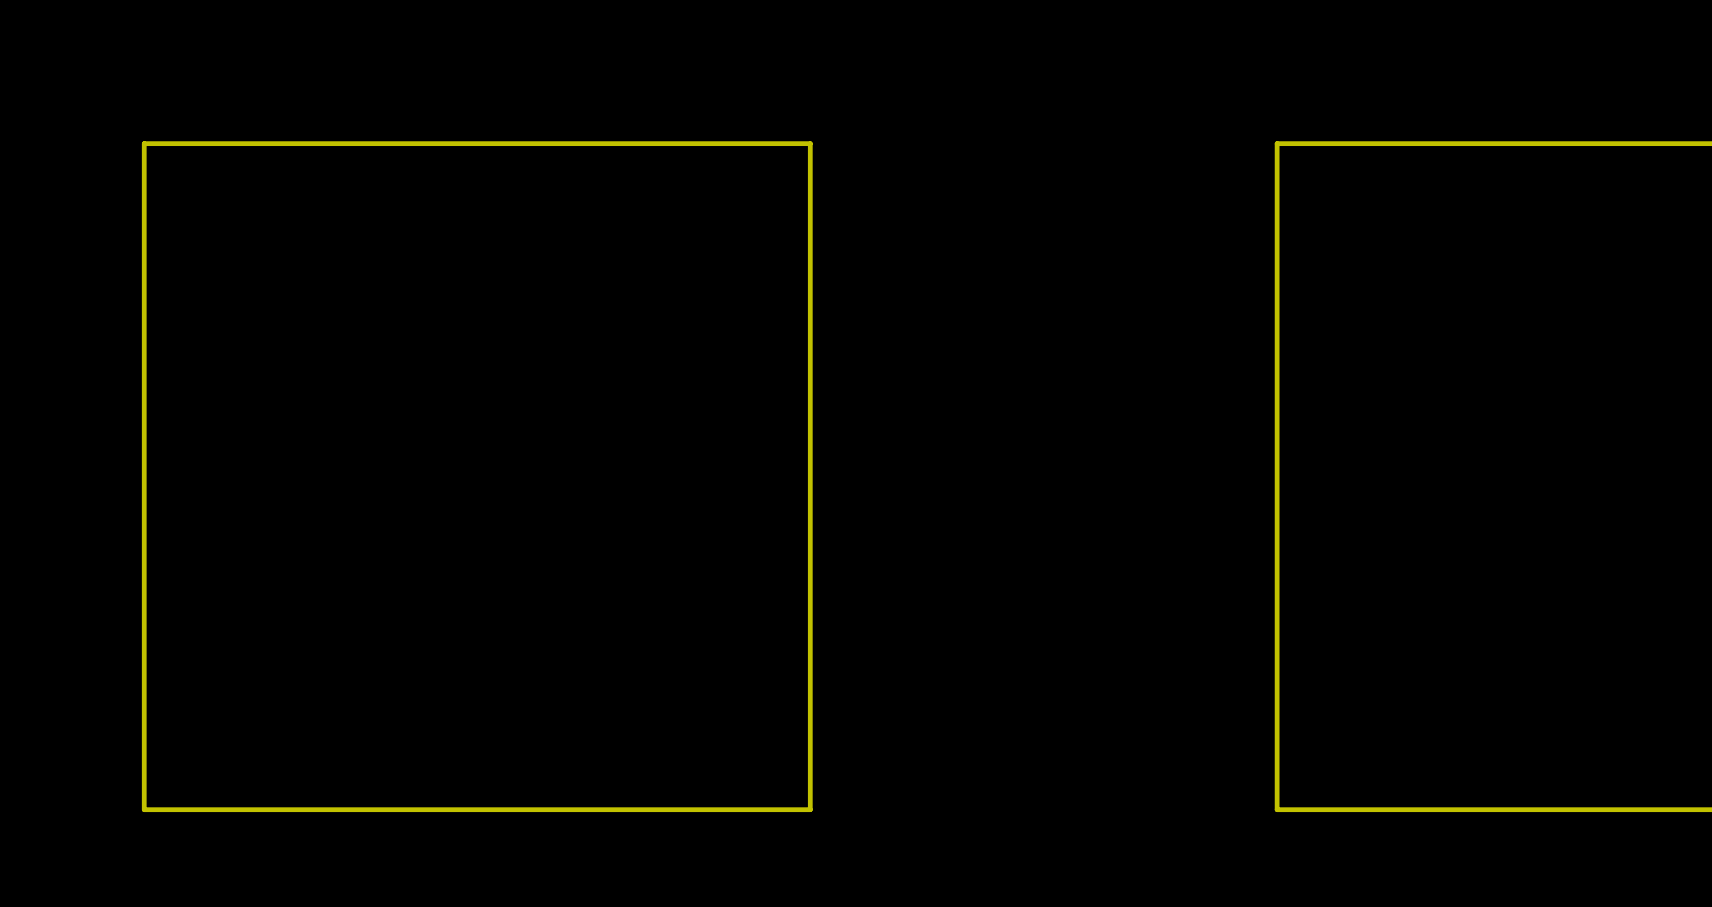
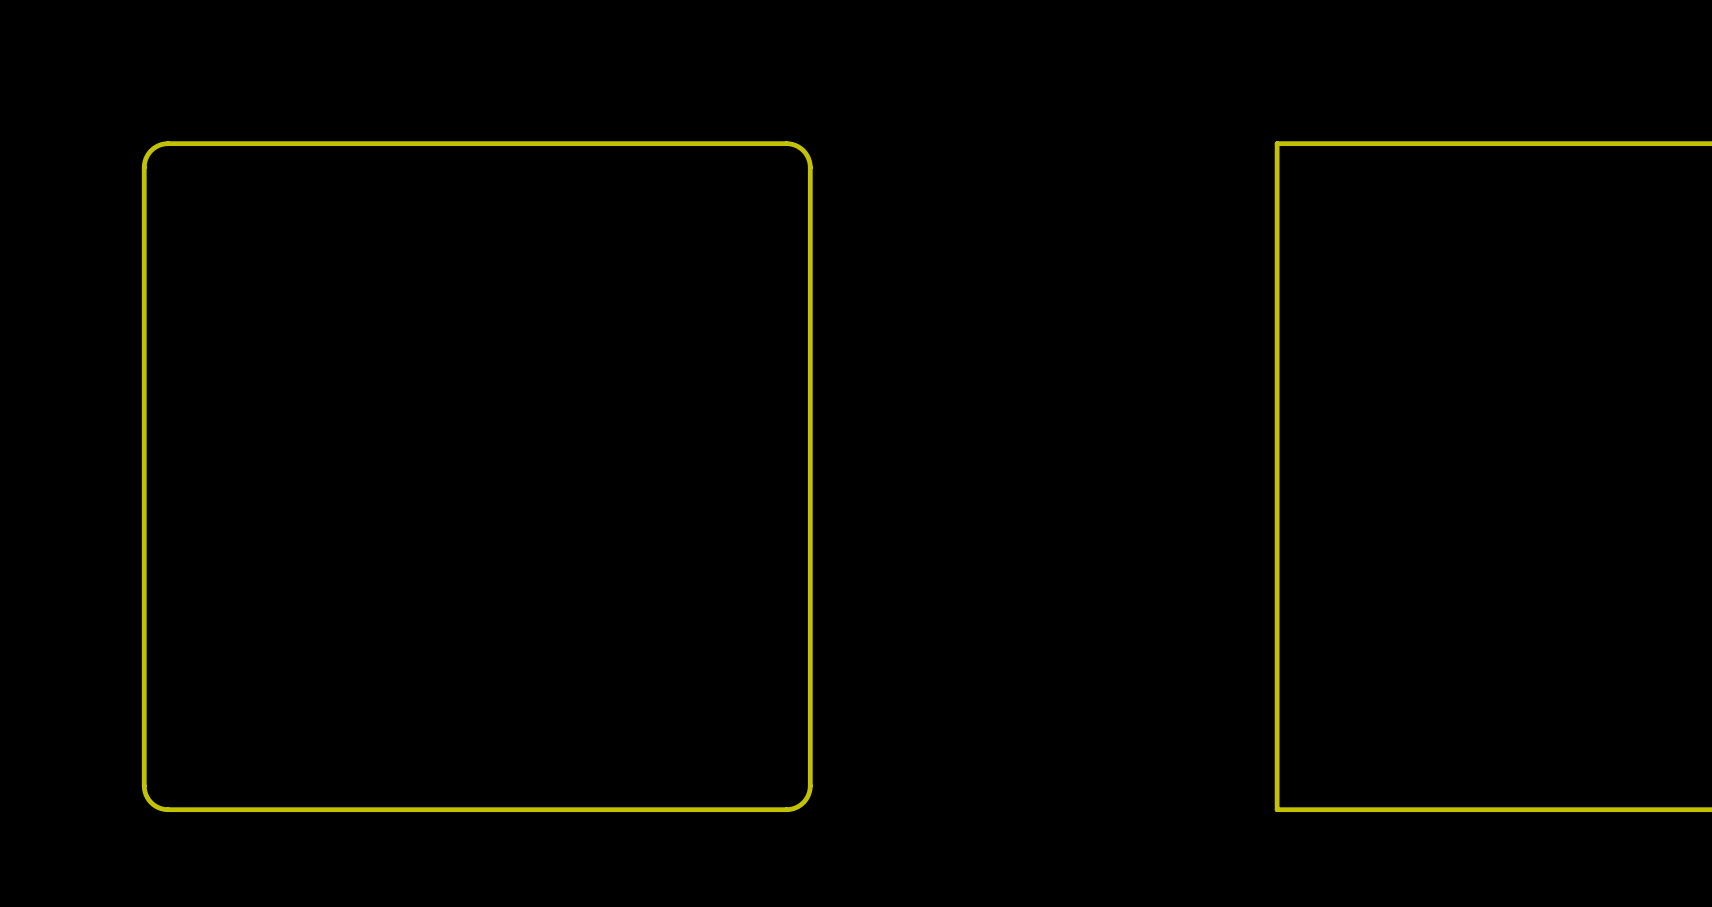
drawing shape: [141, 141, 813, 813] -> [141, 141, 813, 813]

